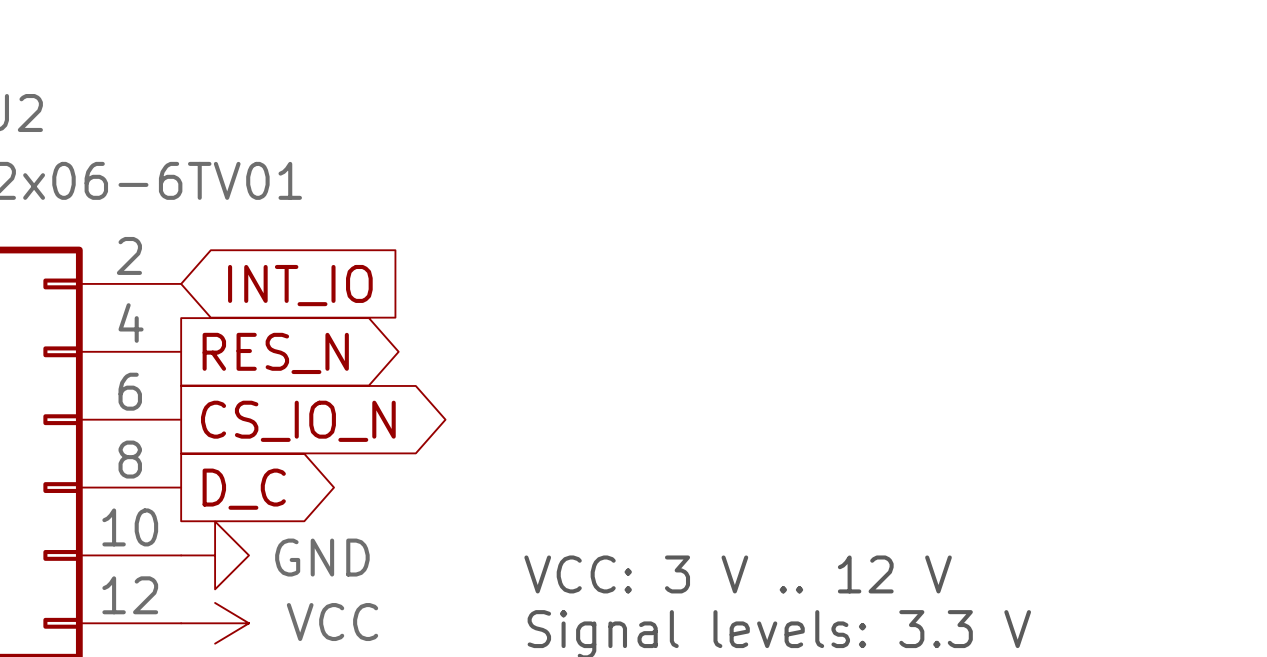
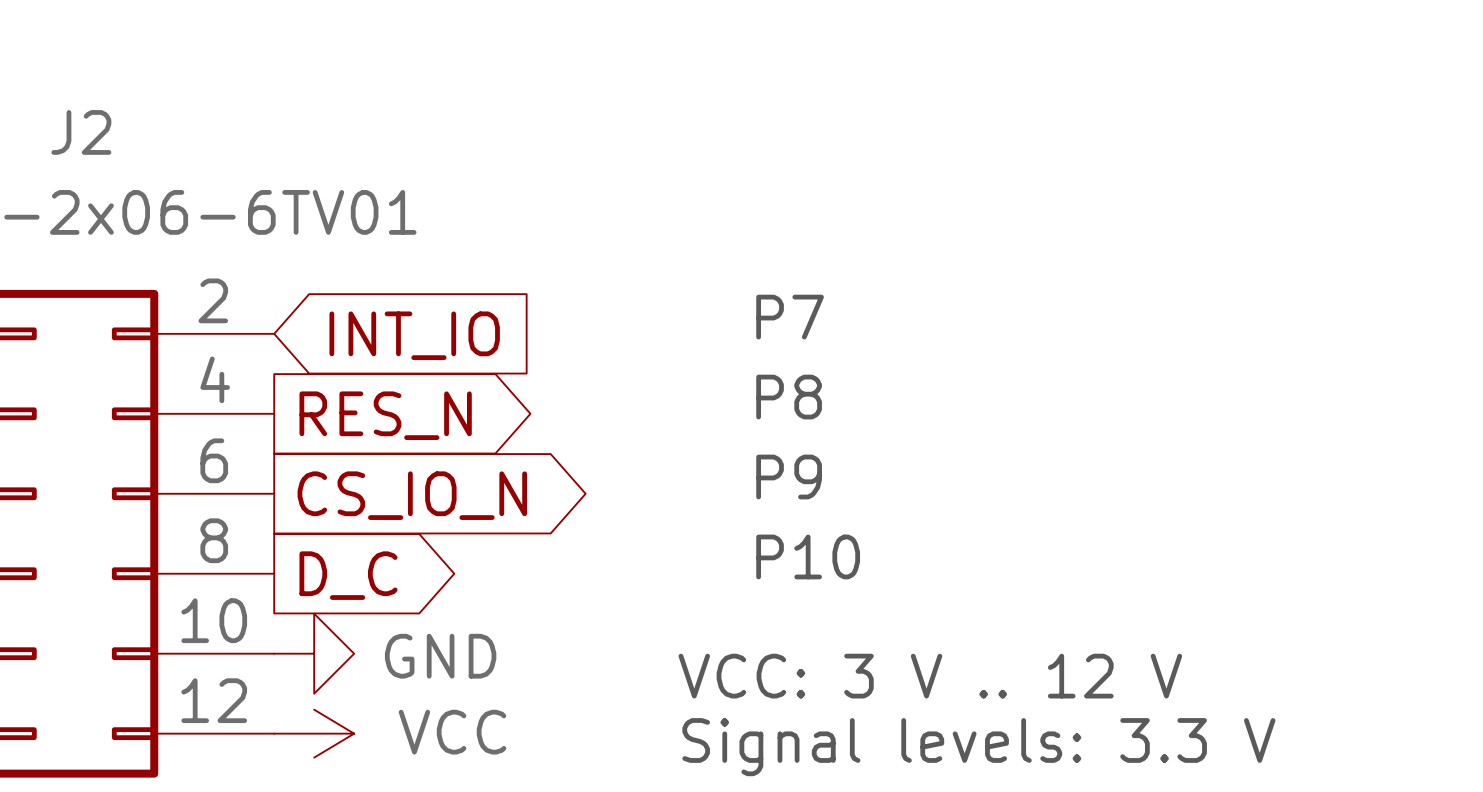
text: none -> P7 (790, 317)
text: none -> P8 (789, 397)
text: none -> P9 (789, 477)
text: none -> P10 (808, 556)

